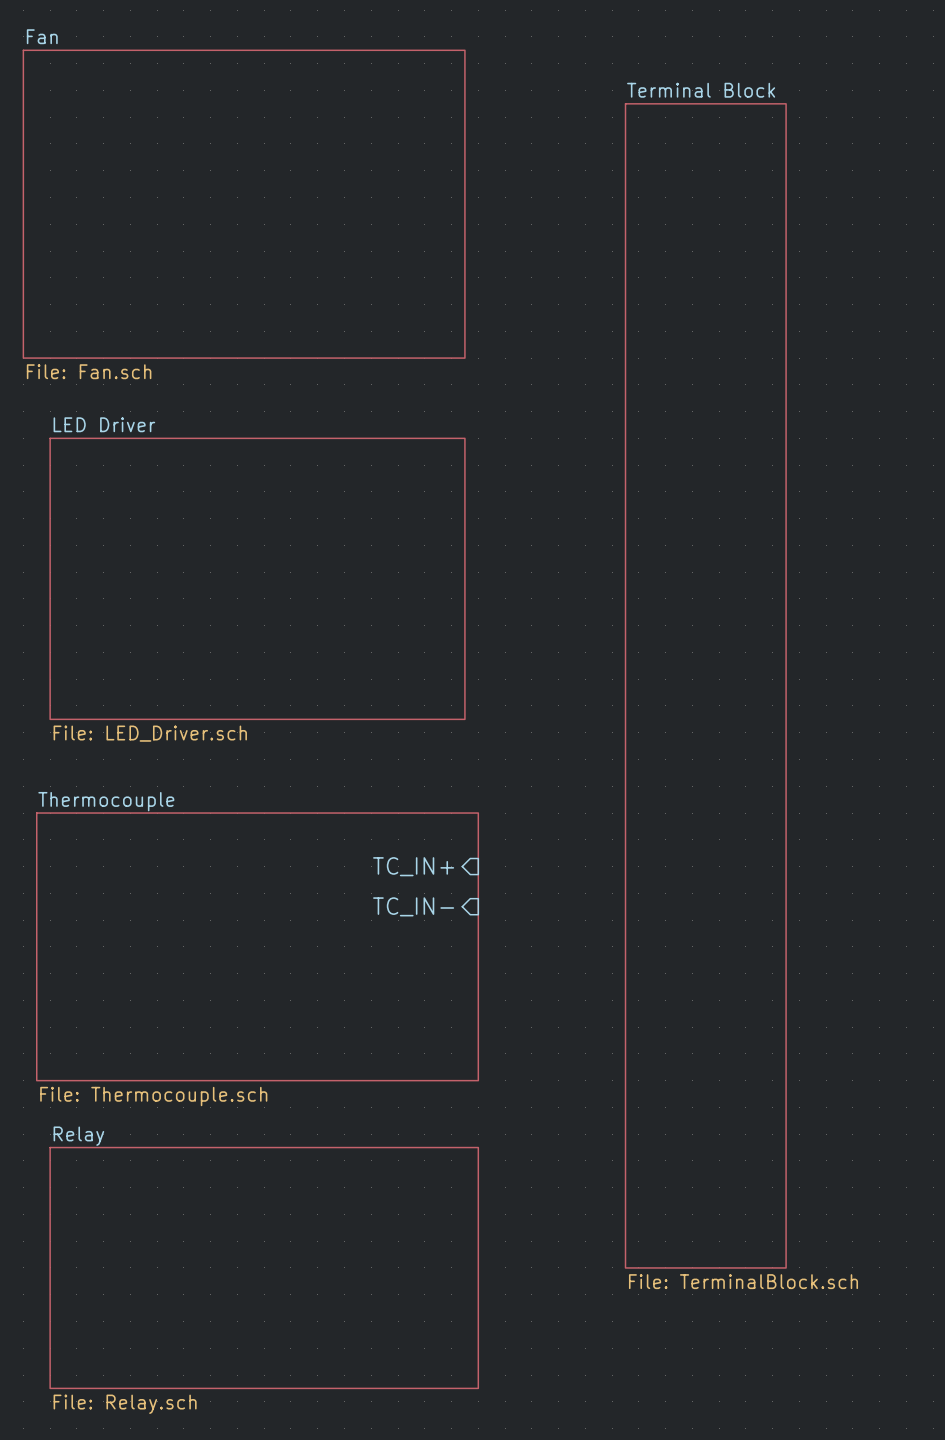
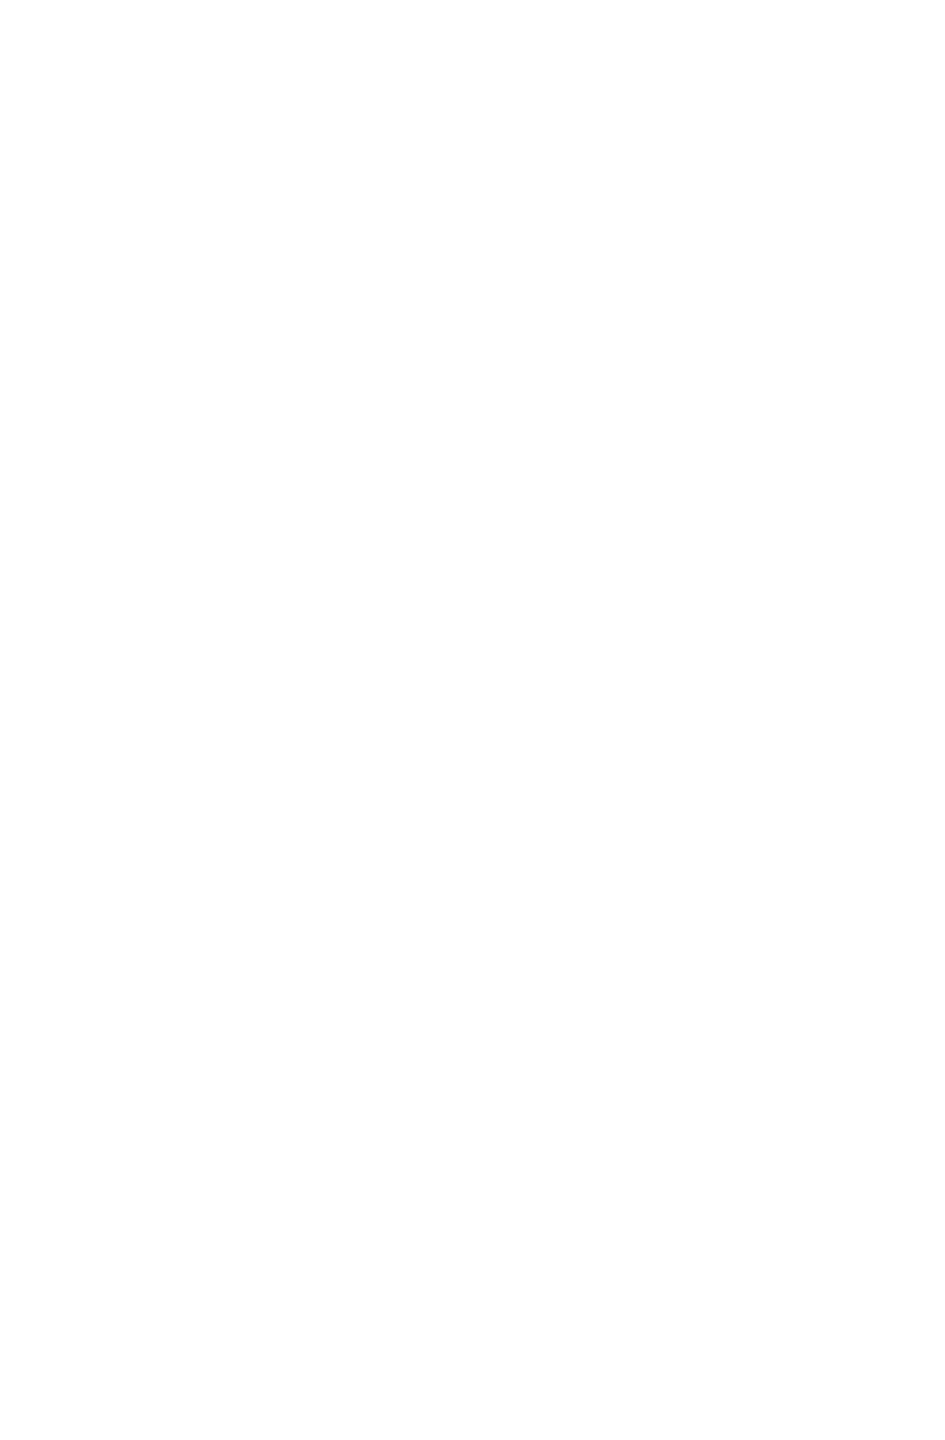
sheet Fan: File: Fan.sch (244, 204) -> none
sheet LED Driver: File: LED_Driver.sch (257, 578) -> none
sheet Terminal Block: File: TerminalBlock.sch (705, 685) -> none
sheet pin: TC_IN+ (413, 866) -> none
sheet pin: TC_IN- (413, 906) -> none
sheet Thermocouple: File: Thermocouple.sch (257, 946) -> none
sheet Relay: File: Relay.sch (264, 1267) -> none

